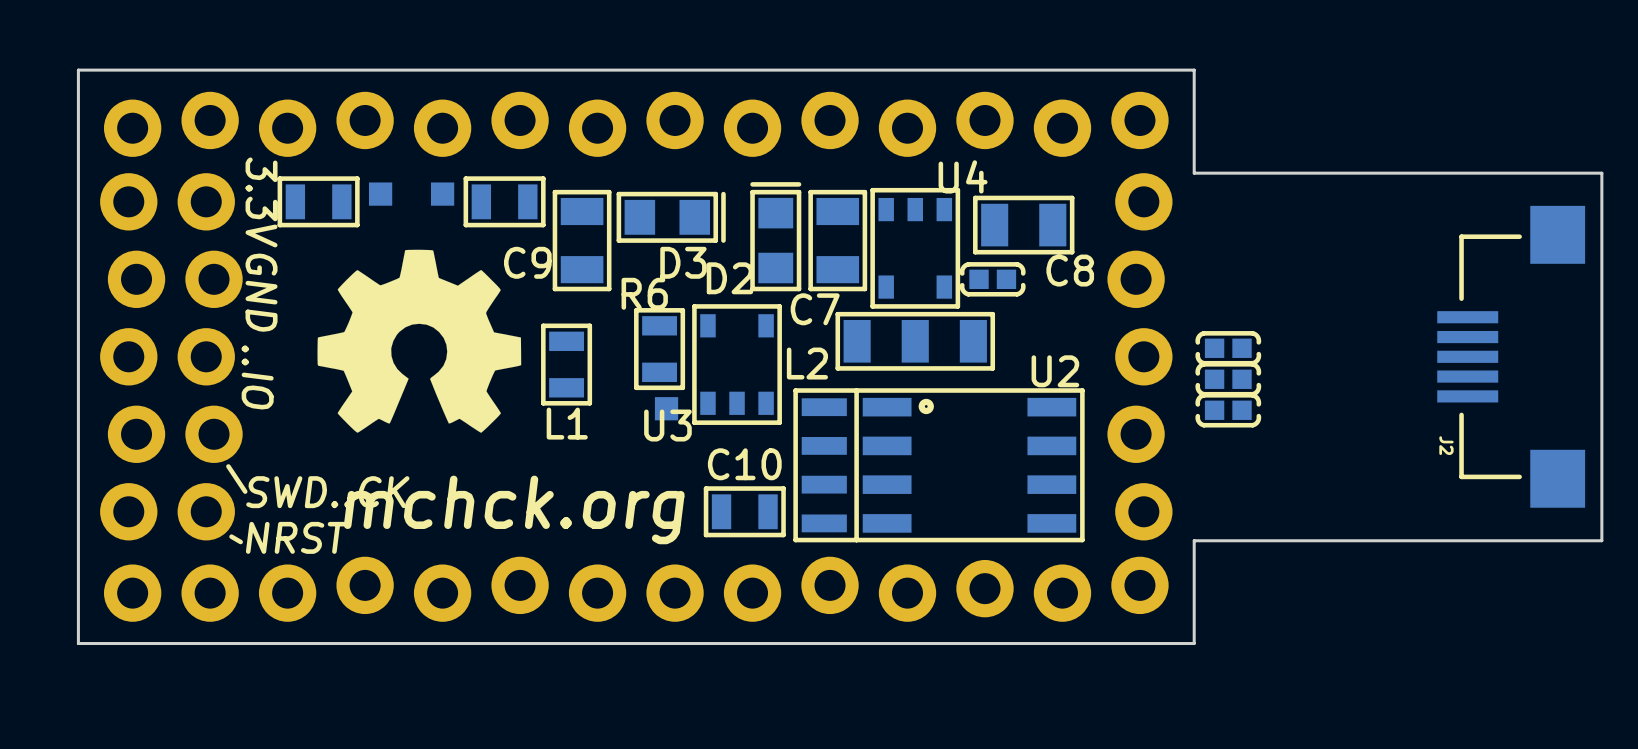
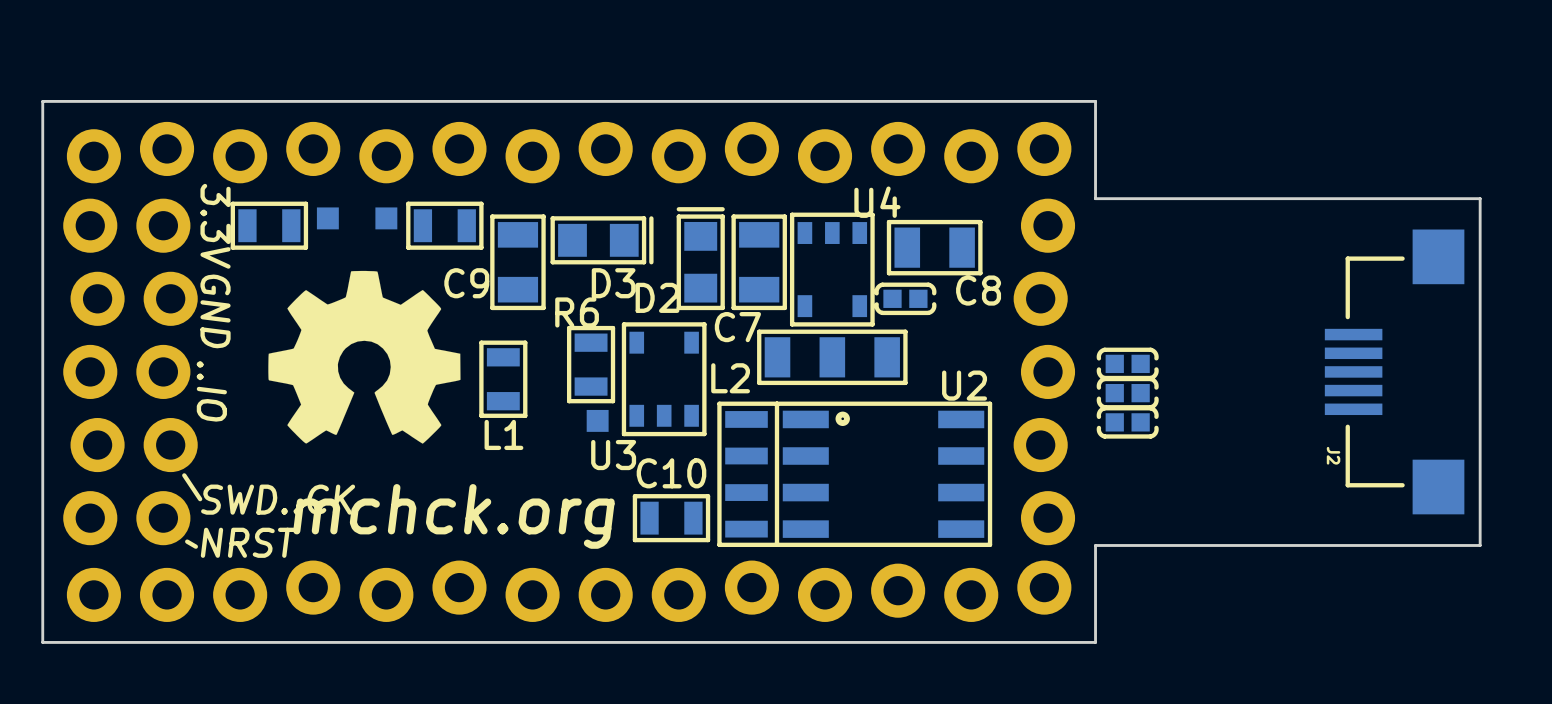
U3 name position: U3 (667, 425) -> U3 (613, 455)

